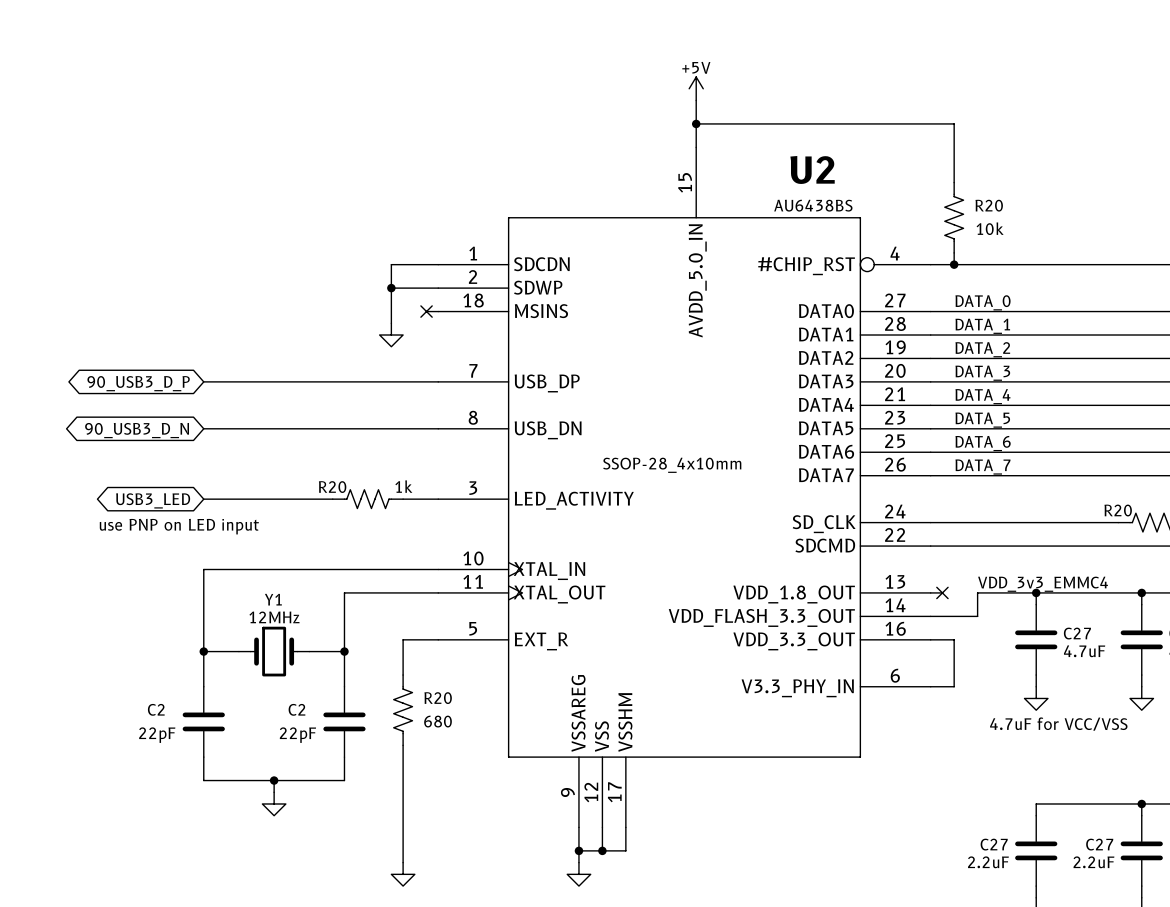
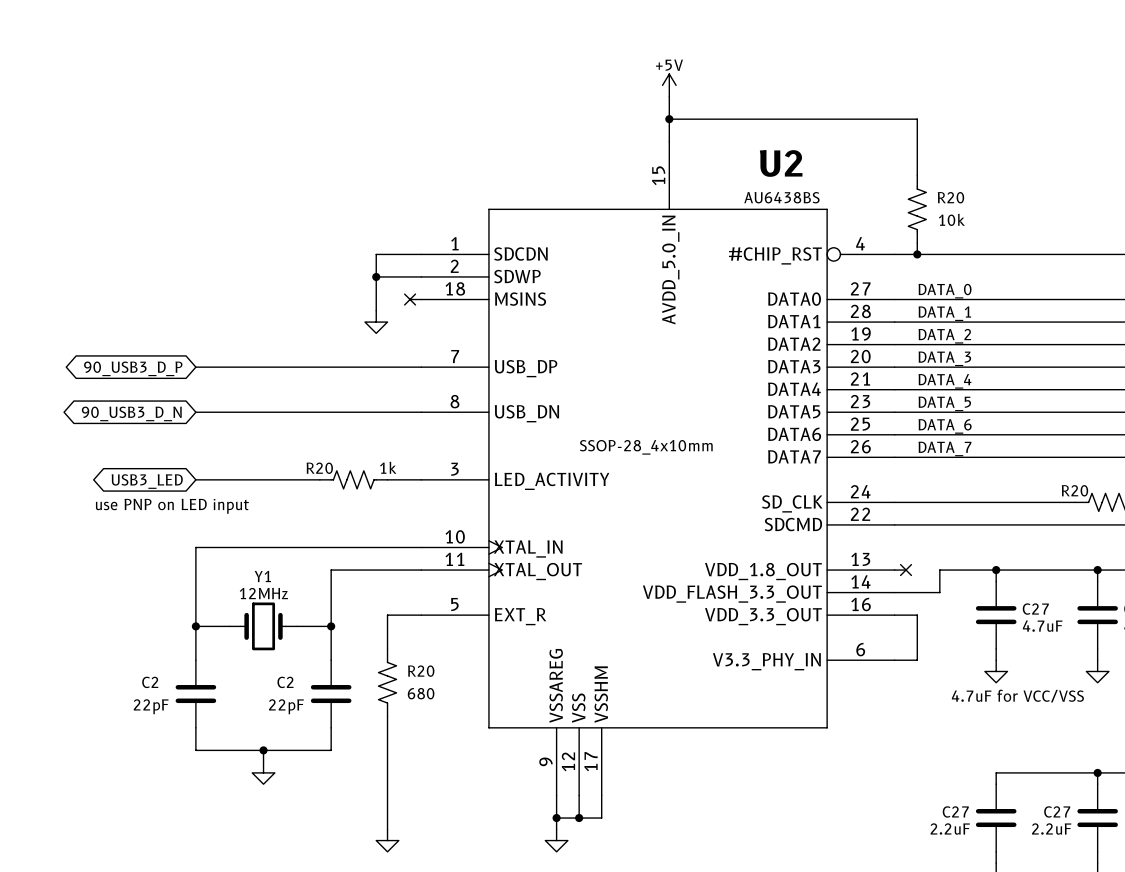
label: VDD_3v3_EMMC4 (1043, 584) -> none

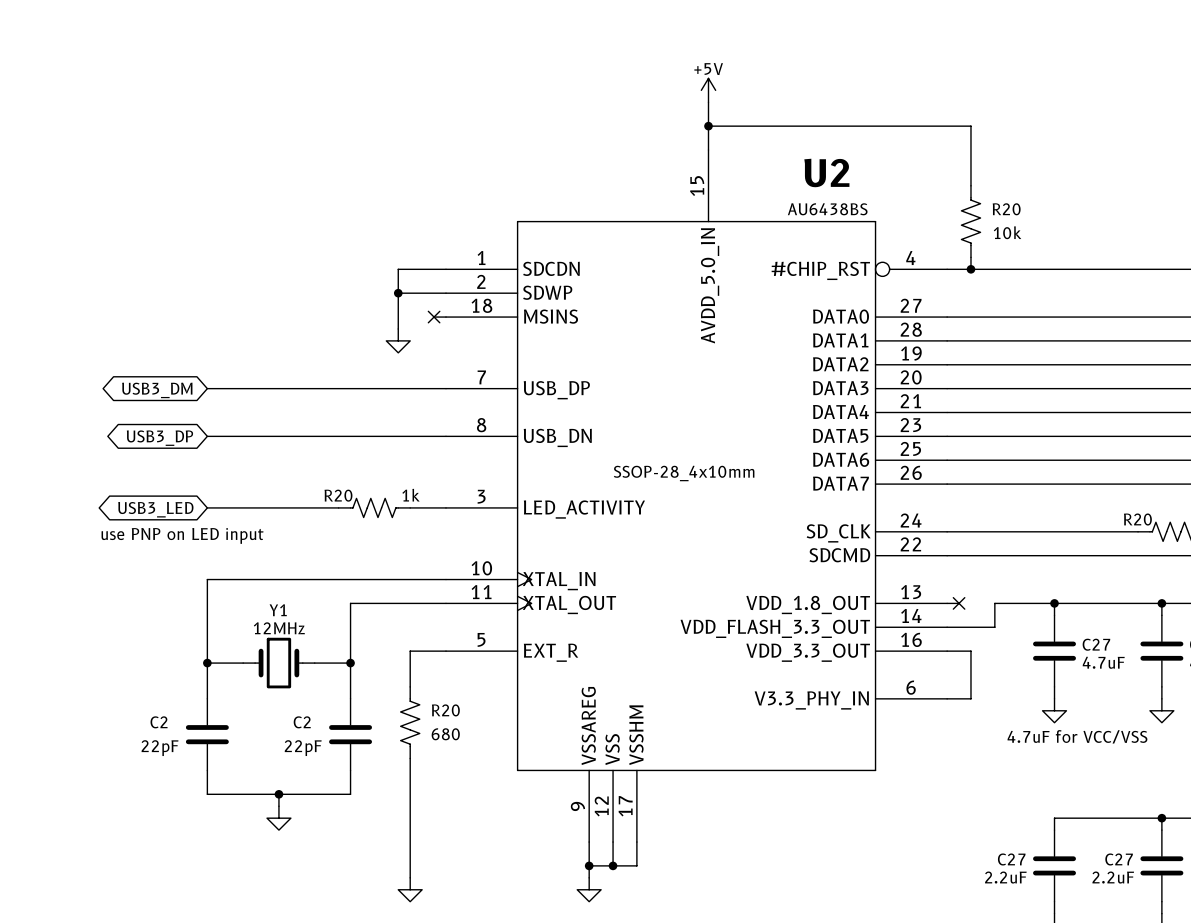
label: DATA_0 (945, 291) -> none
label: DATA_1 (944, 313) -> none
label: DATA_2 (944, 336) -> none
label: DATA_3 (944, 358) -> none
global label: 90_USB3_D_P (133, 368) -> USB3_DM (157, 390)
label: DATA_4 (944, 381) -> none
label: DATA_5 (944, 403) -> none
global label: 90_USB3_D_N (131, 413) -> USB3_DP (159, 438)
label: DATA_6 (945, 426) -> none
label: DATA_7 (944, 448) -> none

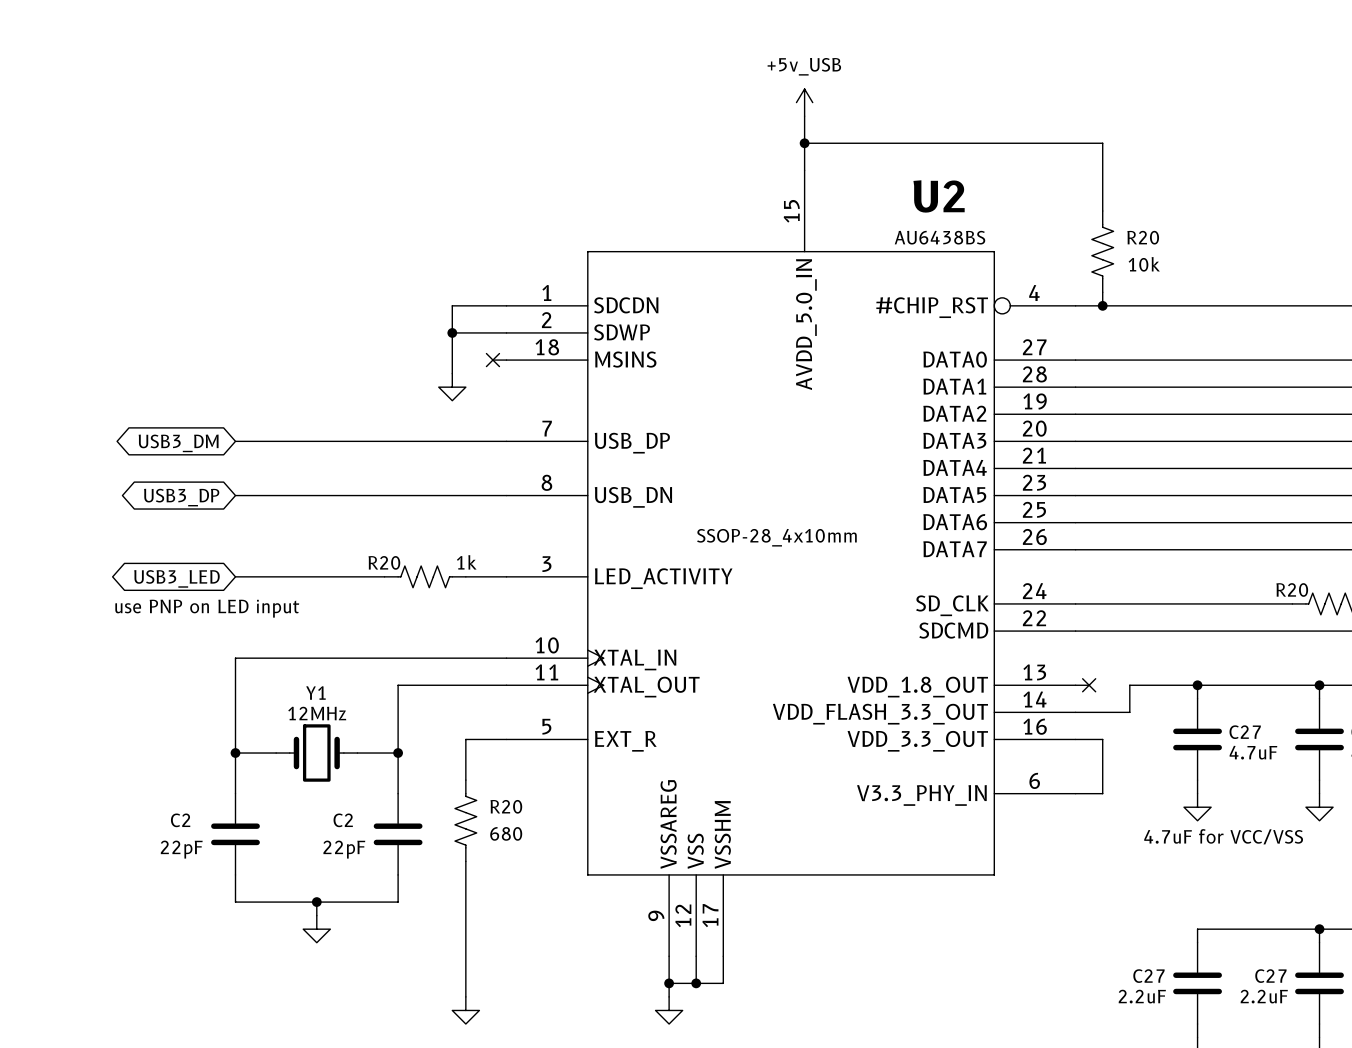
power symbol: +5V (708, 90) -> +5v_USB (804, 102)

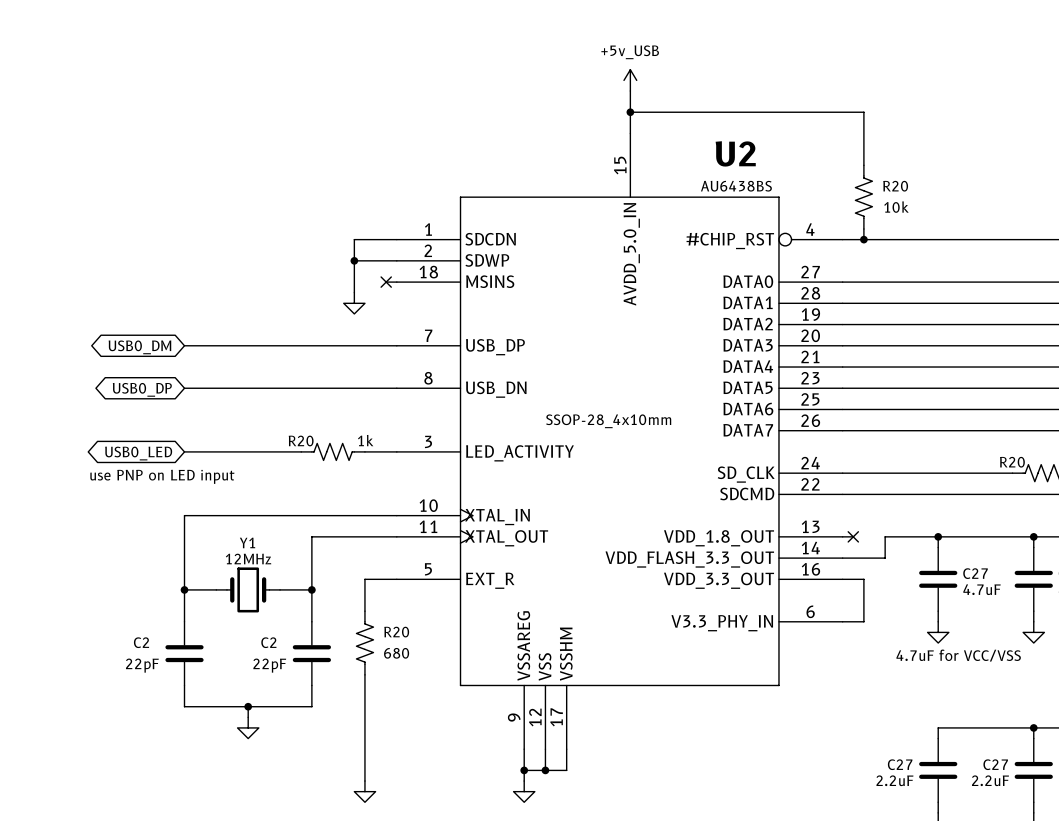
global label: USB3_DM (178, 443) -> USB0_DM (139, 347)
global label: USB3_DP (181, 497) -> USB0_DP (142, 389)
global label: USB3_LED (176, 578) -> USB0_LED (138, 453)

